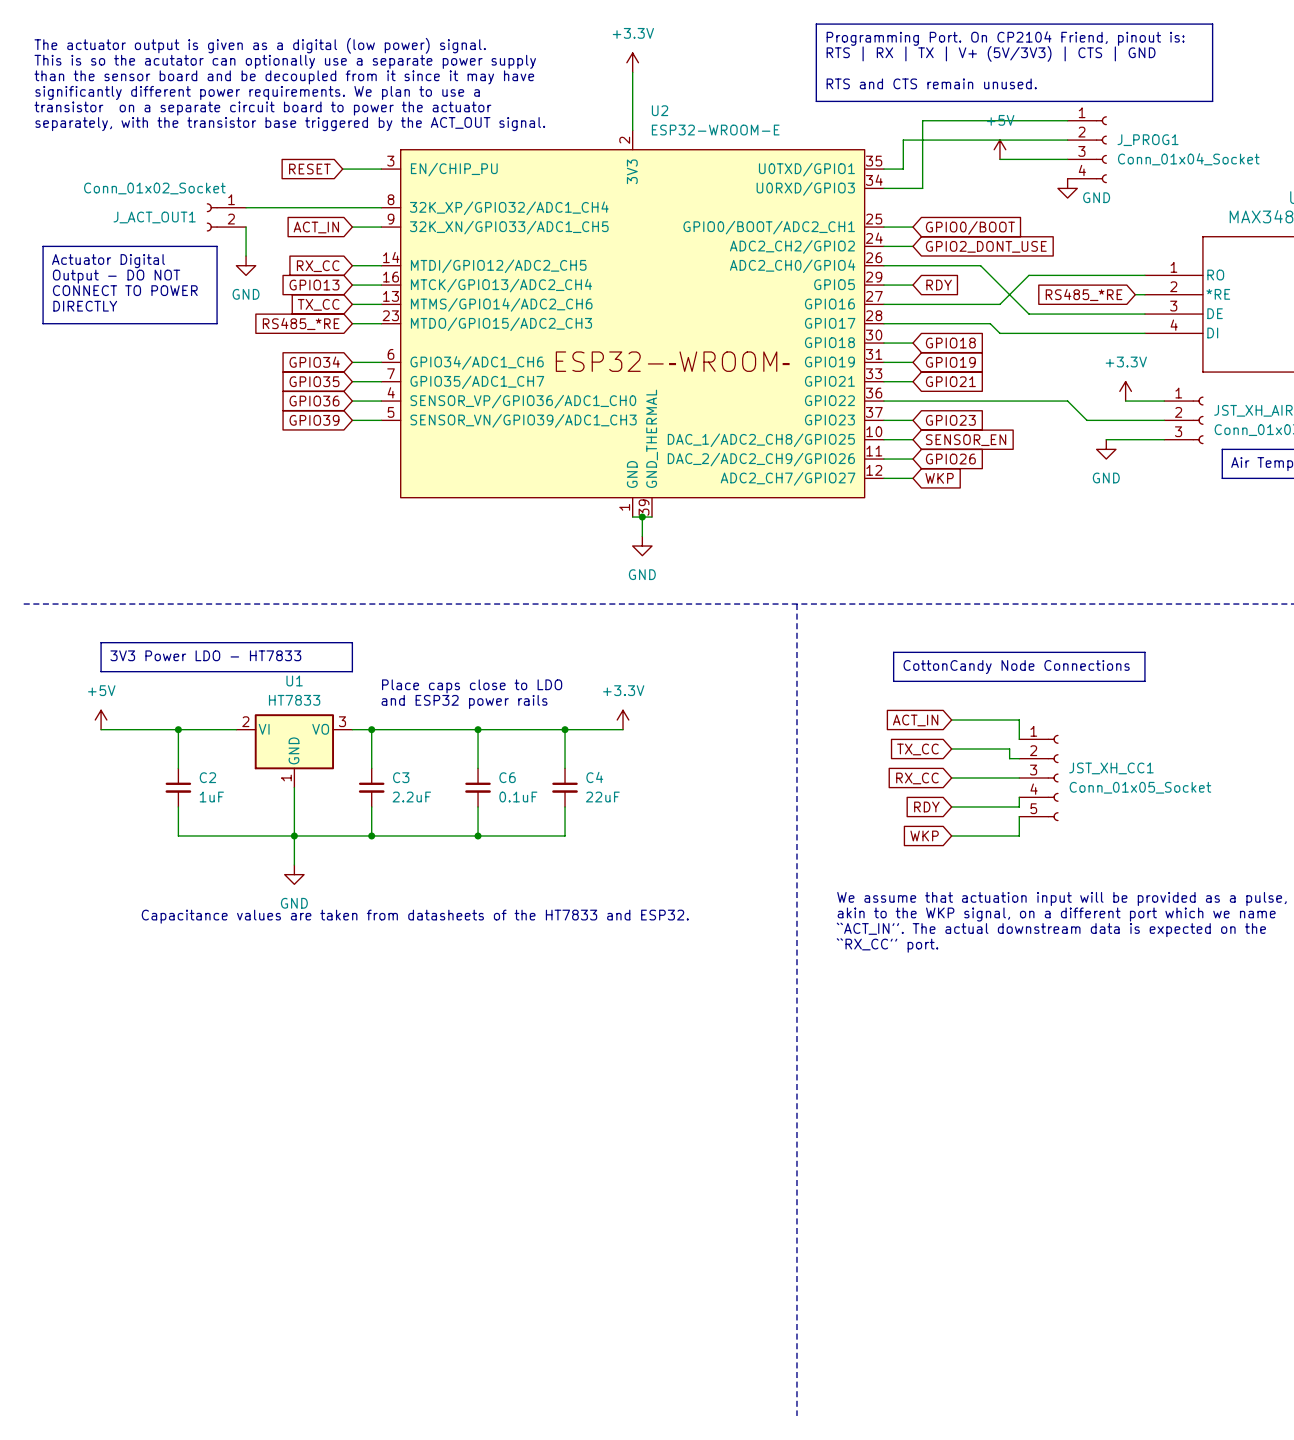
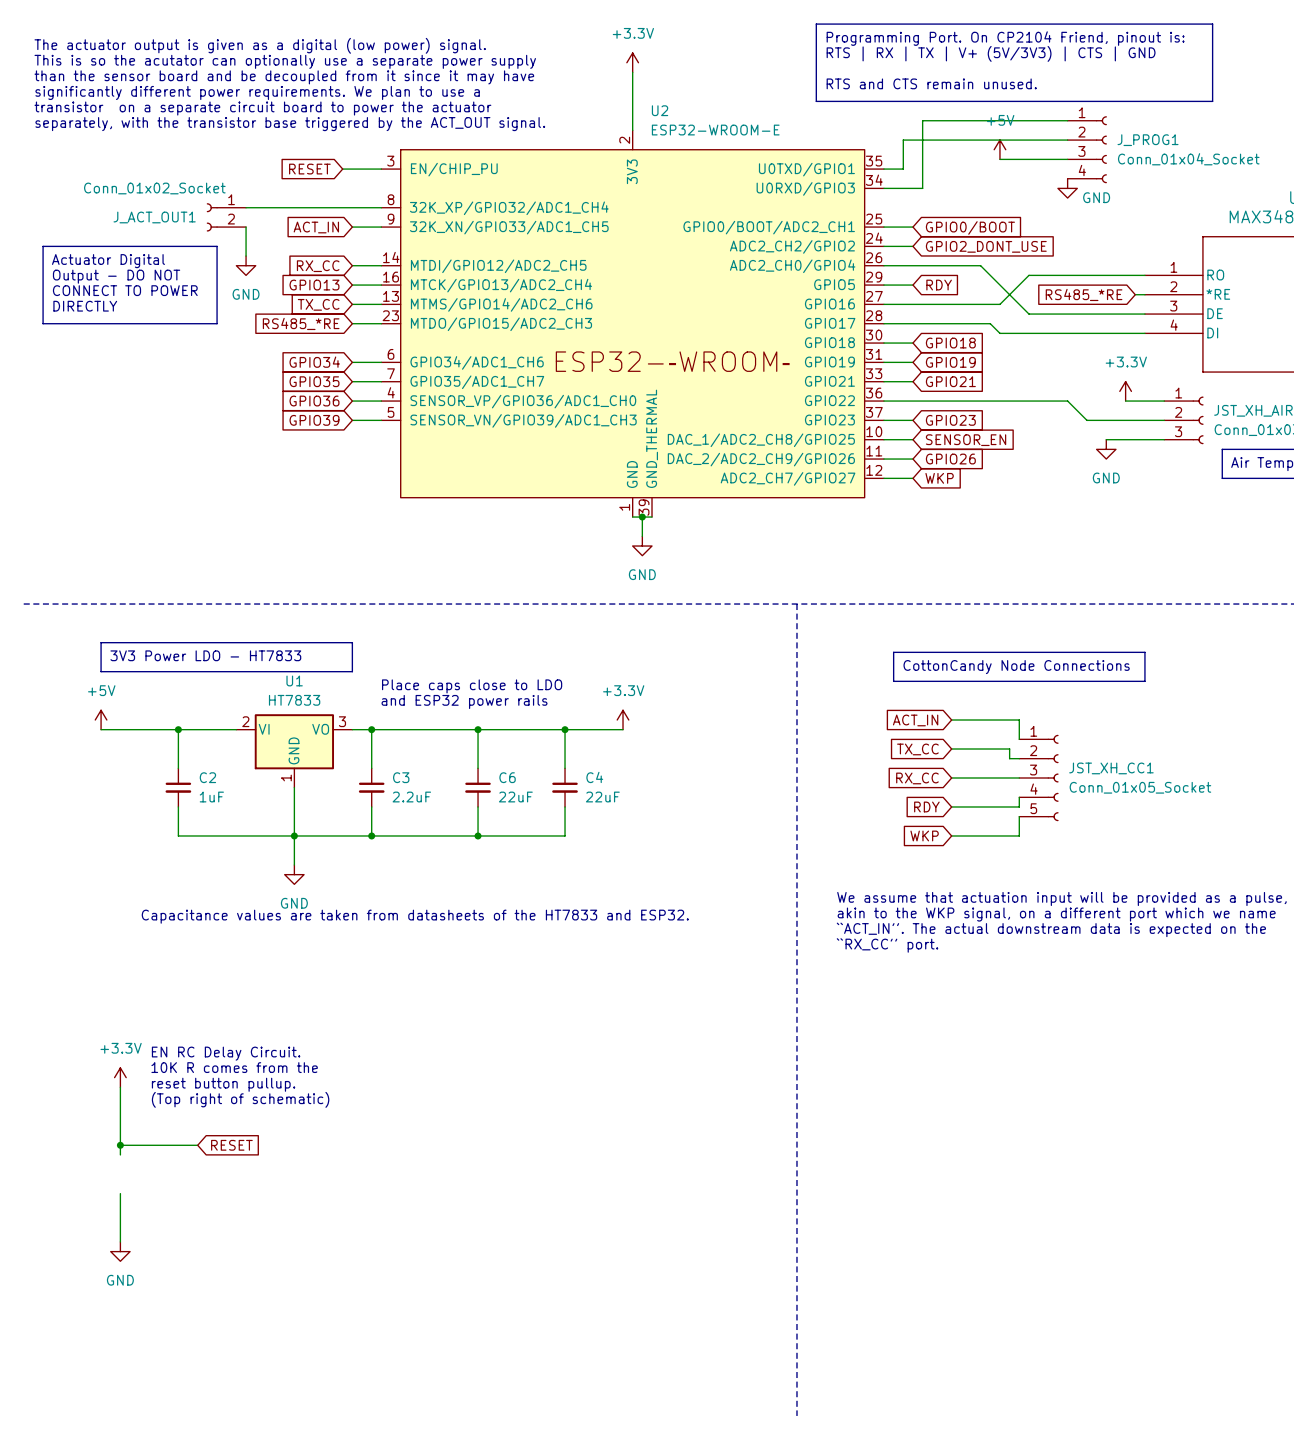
C6 value: 0.1uF (518, 797) -> 22uF (515, 797)
text: none -> EN RC Delay Circuit. (226, 1053)
text: none -> 10K R comes from the (234, 1067)
power symbol: none -> +3.3V (120, 1077)
text: none -> reset button pullup. (223, 1084)
wire: none -> (120, 1087) (120, 1154)
text: none -> (Top right of schematic) (240, 1099)
wire: none -> (120, 1145) (197, 1145)
junction: none -> (120, 1145)
global label: none -> RESET (231, 1145)
wire: none -> (120, 1193) (120, 1241)
power symbol: none -> GND (120, 1251)

